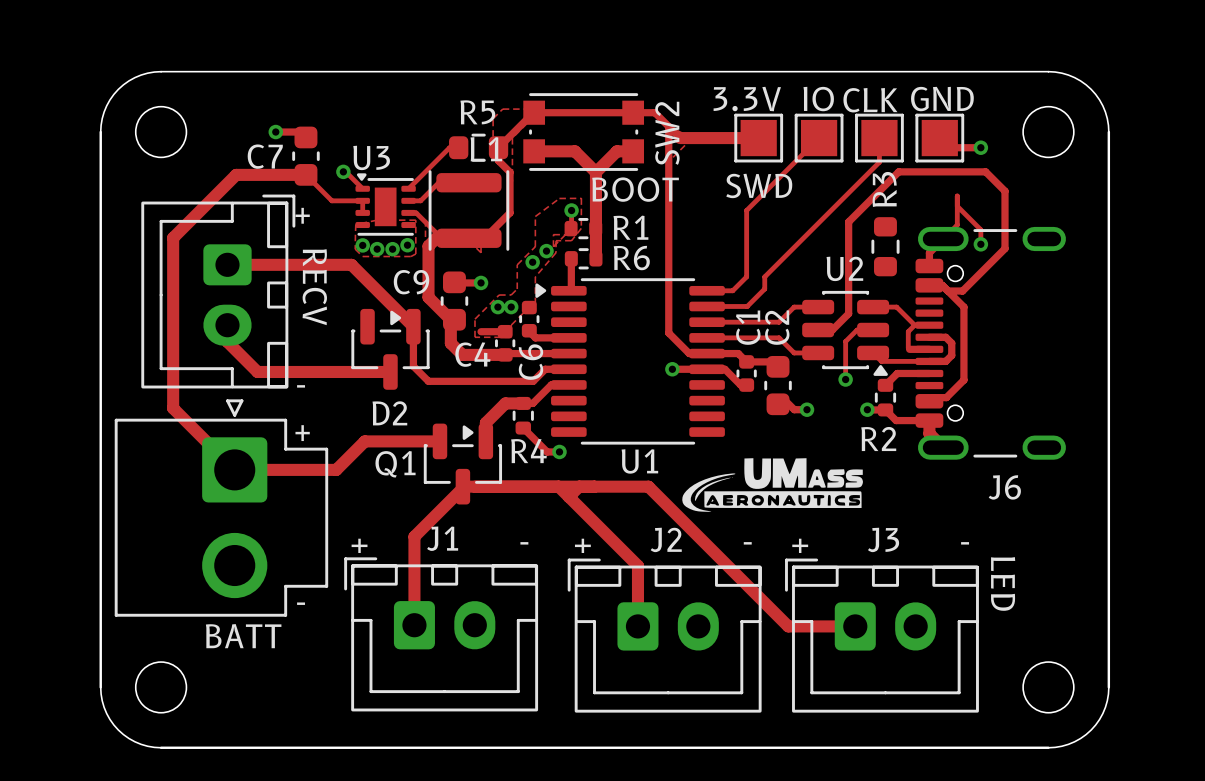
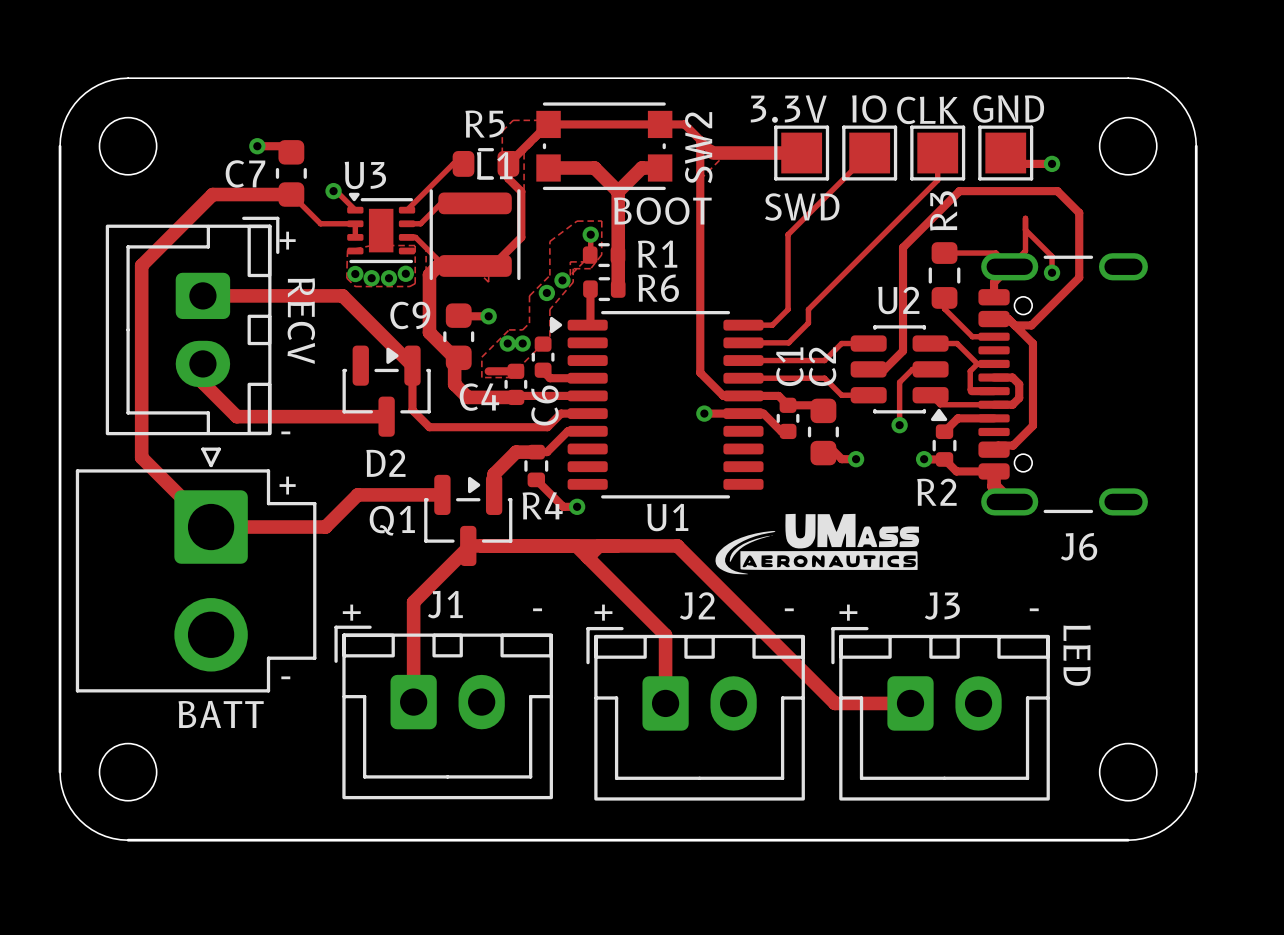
track: none -> (944, 253) (995, 253) (1009, 266)
track: none -> (944, 297) (944, 308) (972, 336) (994, 336)

